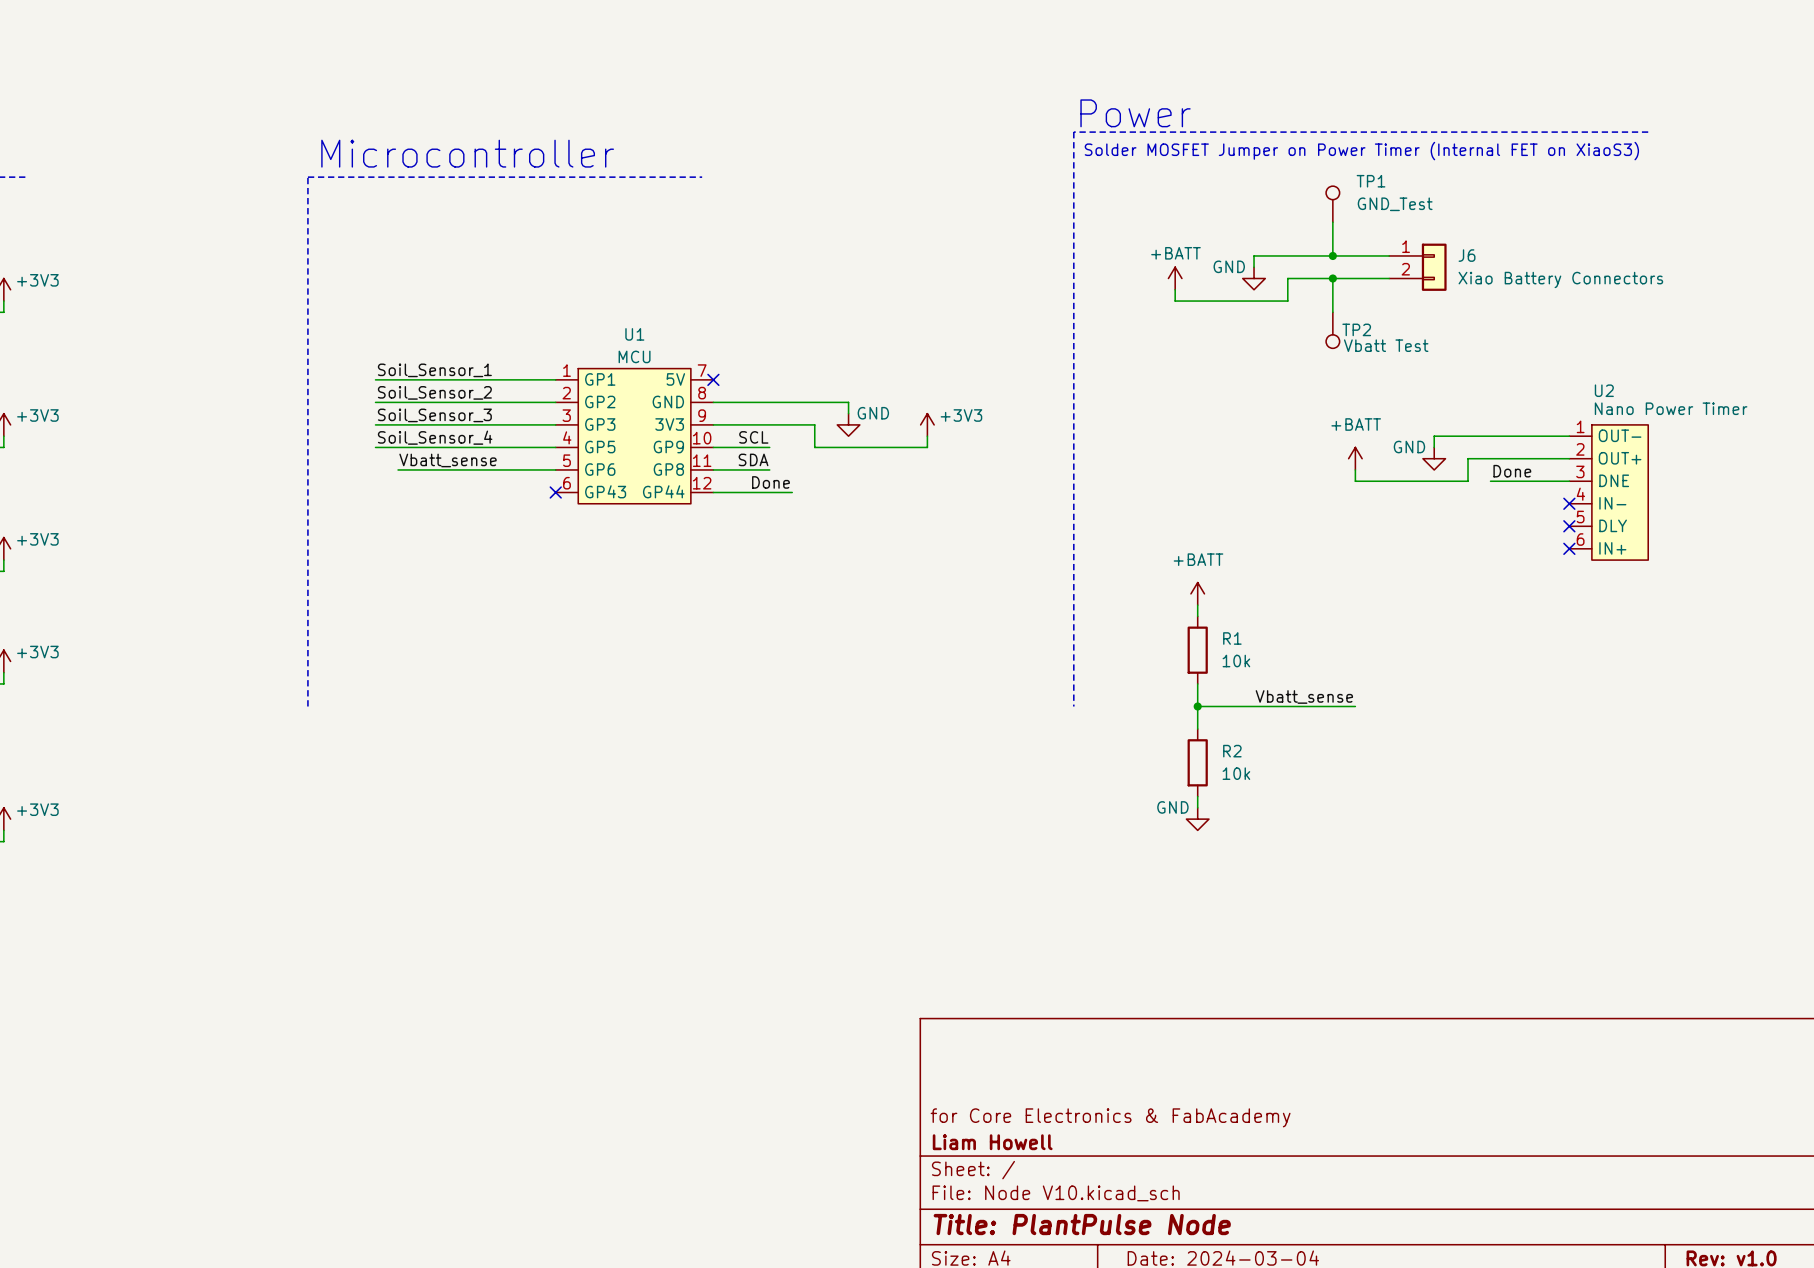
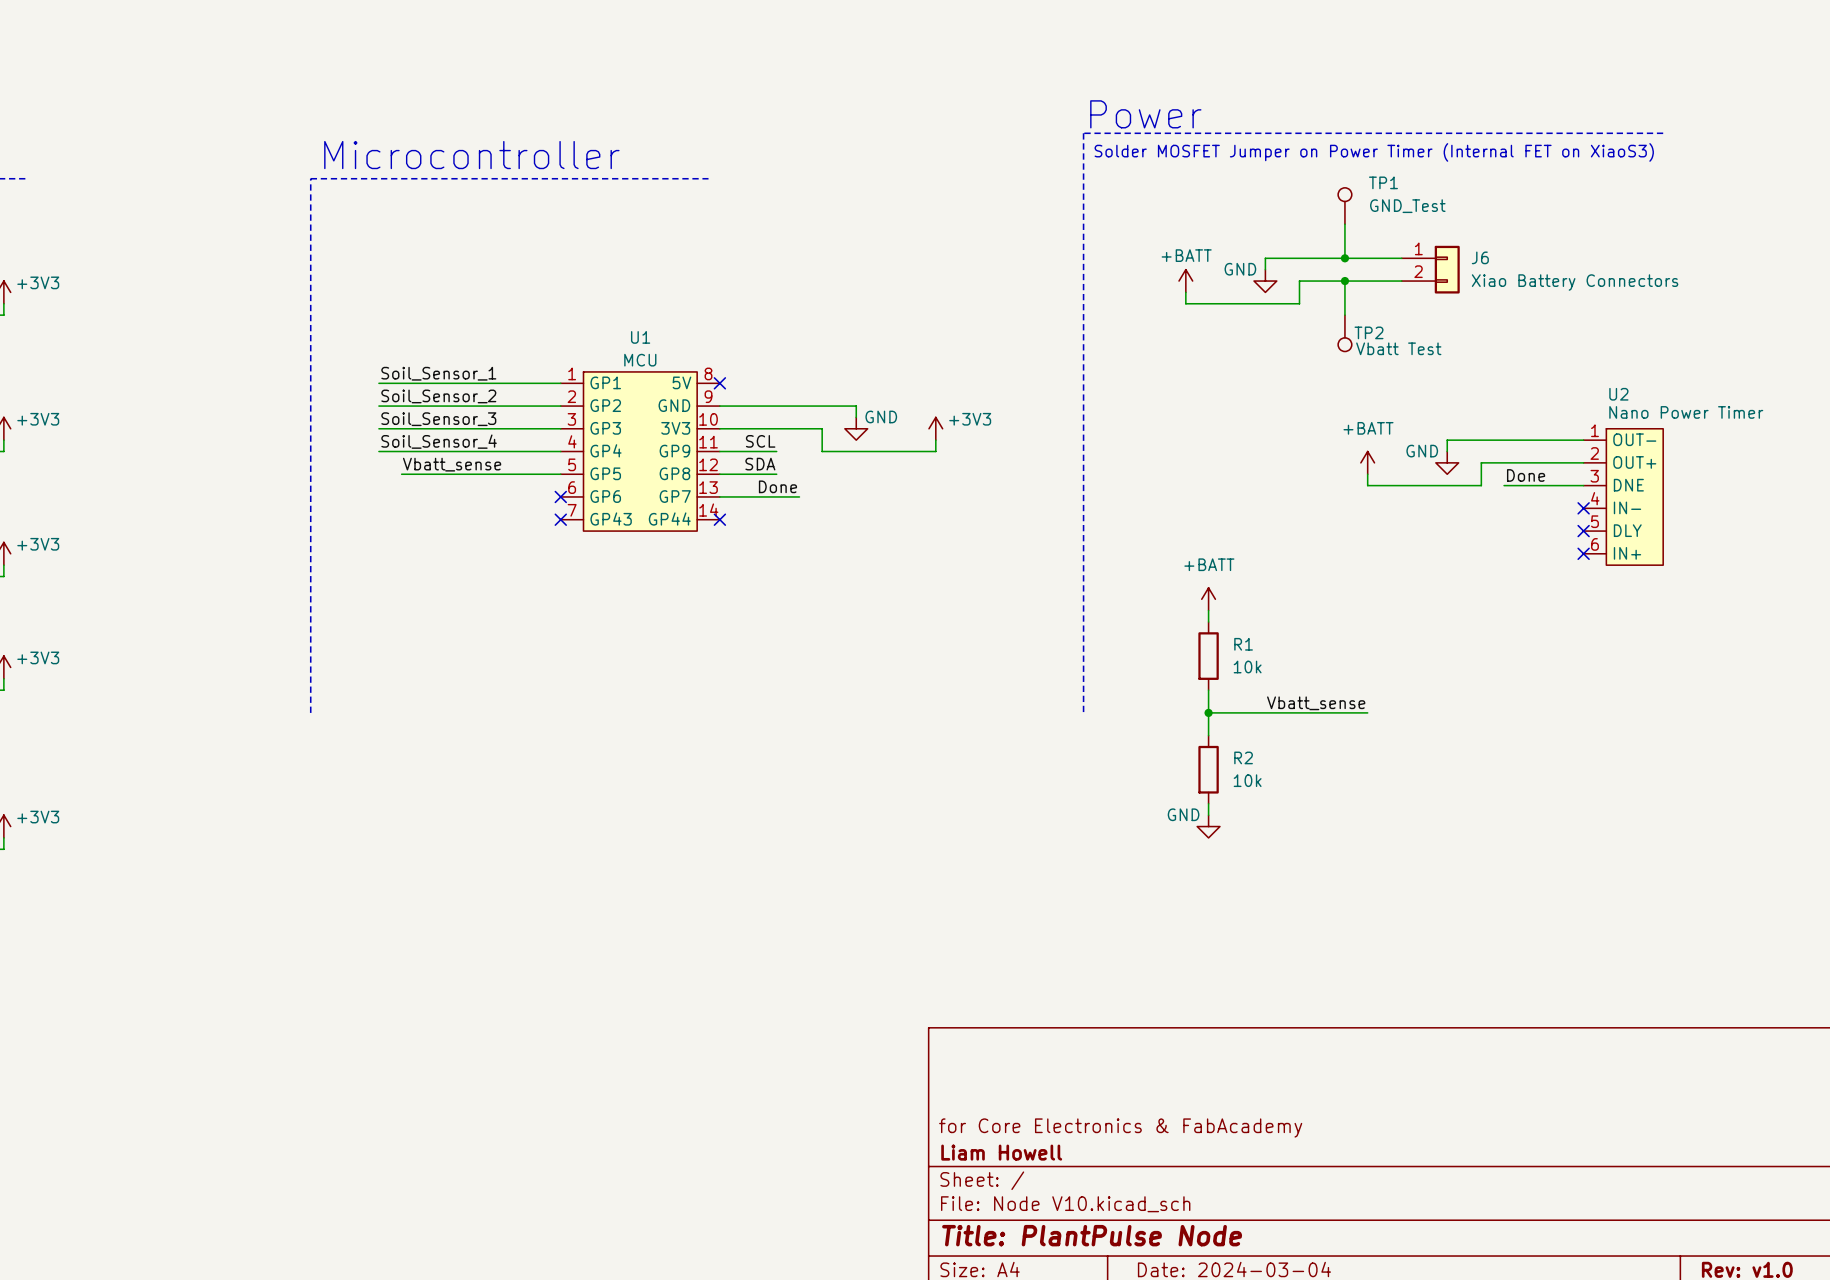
U1 symbol: [555, 368, 714, 504] -> [560, 371, 720, 532]
no-connect mark: none -> (560, 519)
no-connect mark: none -> (719, 519)

